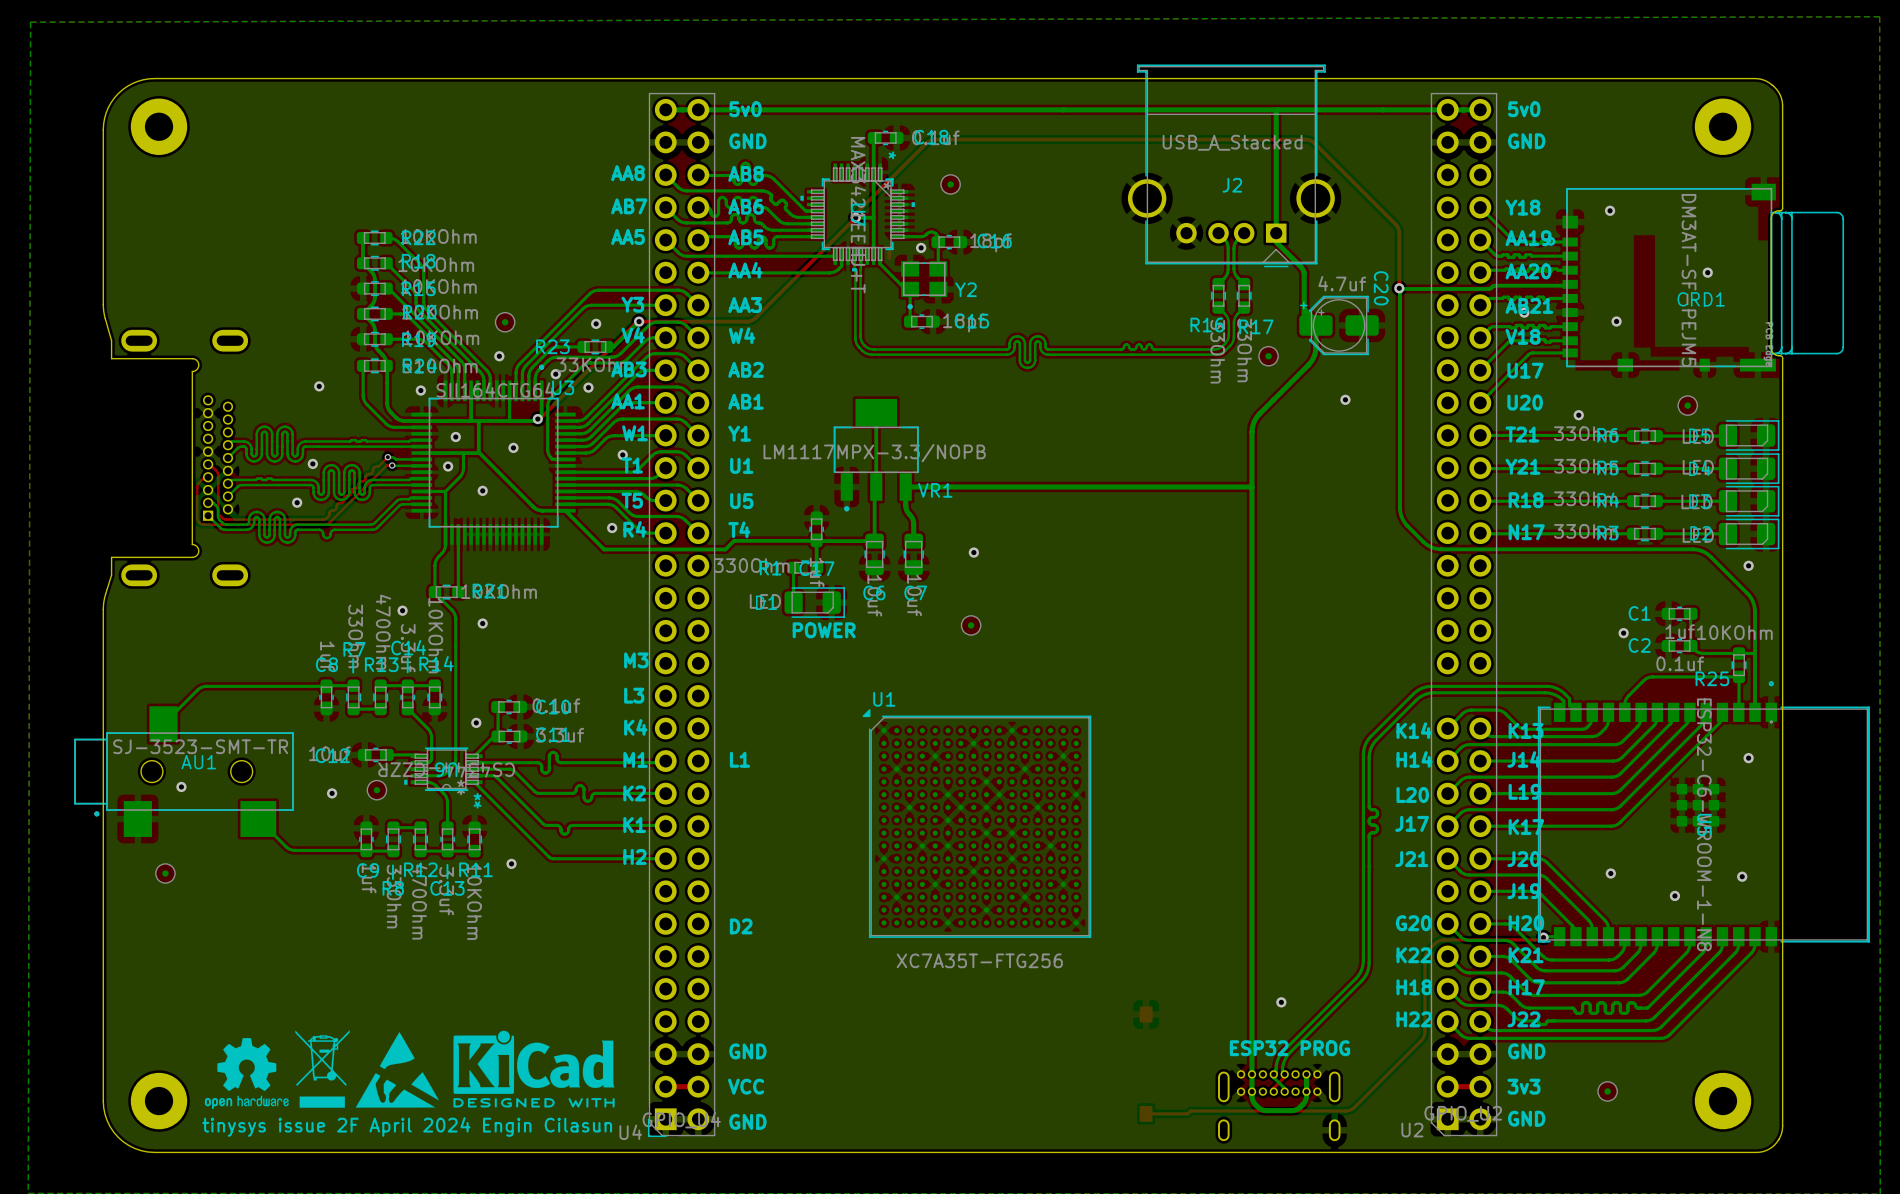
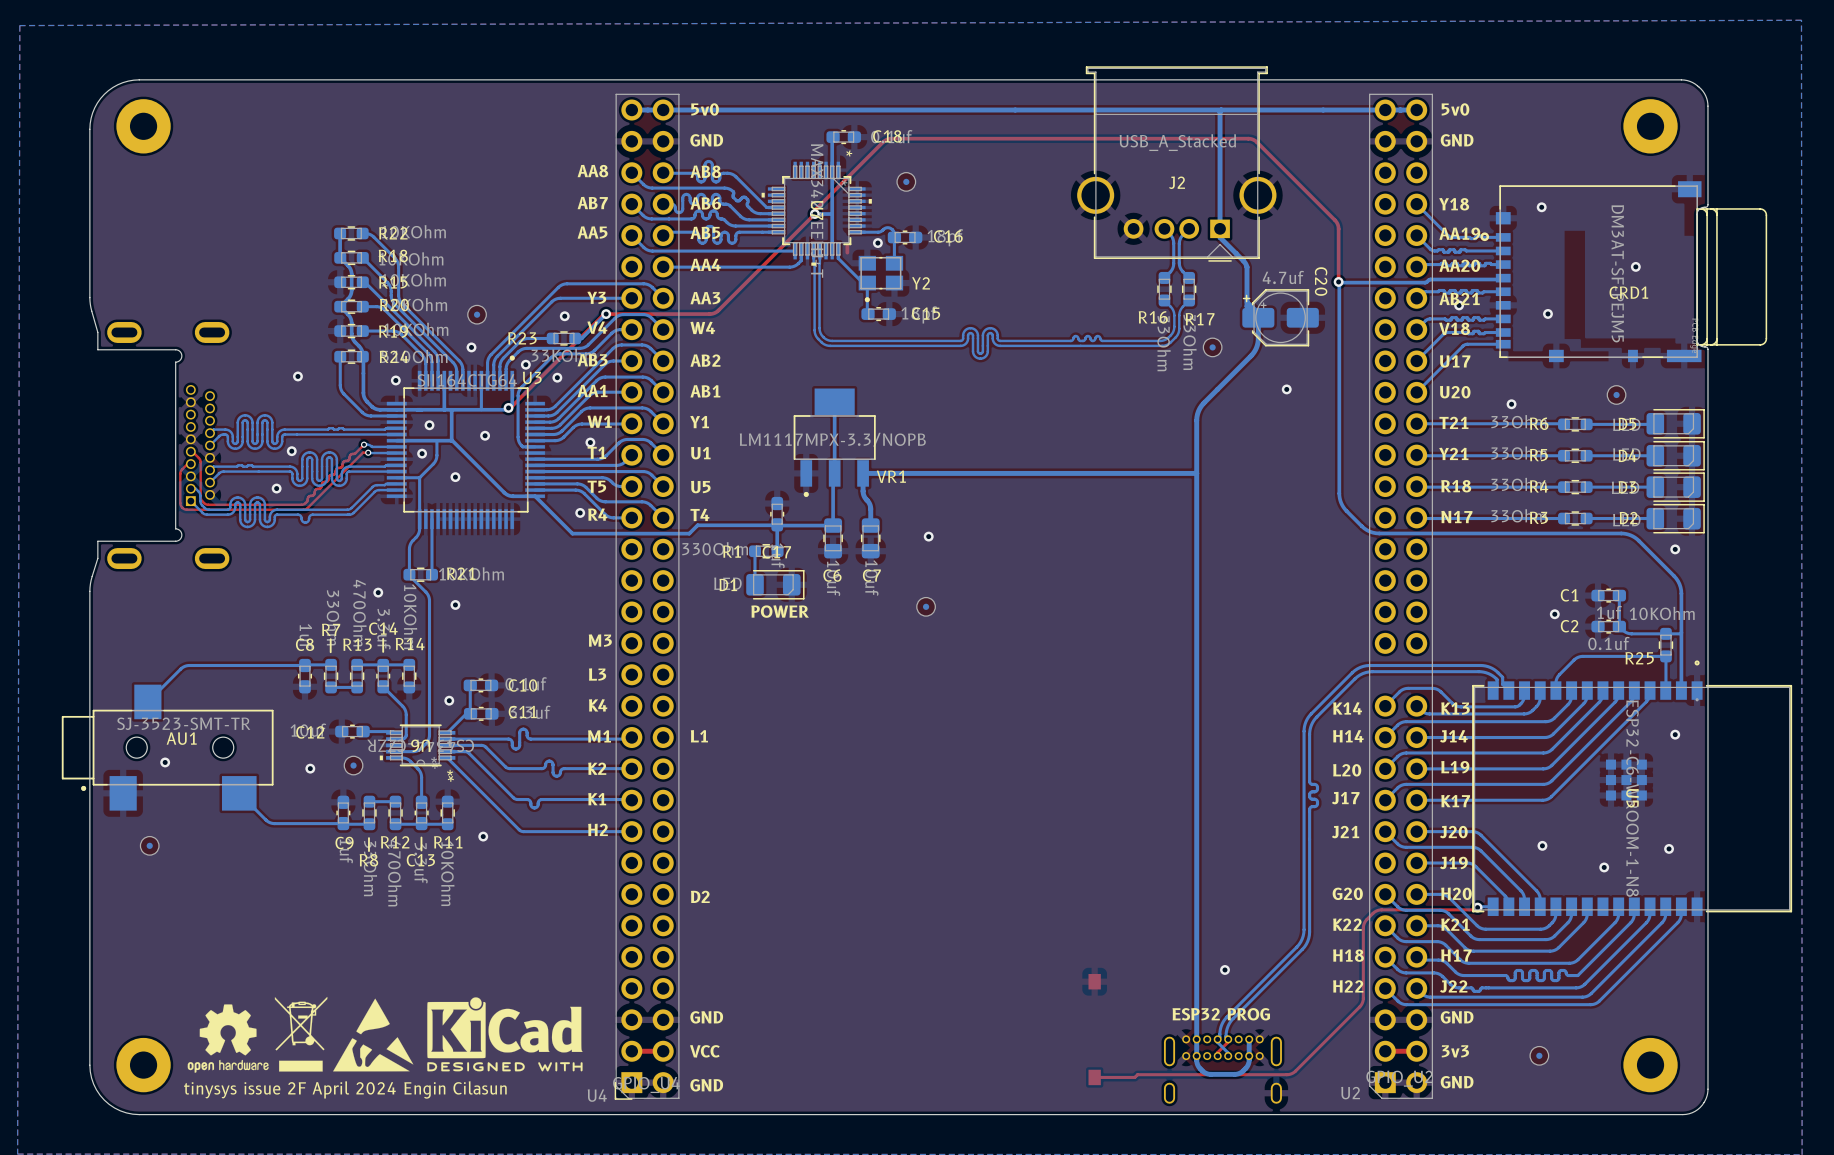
U1: XC7A35T-FTG256 (976, 823) -> none

